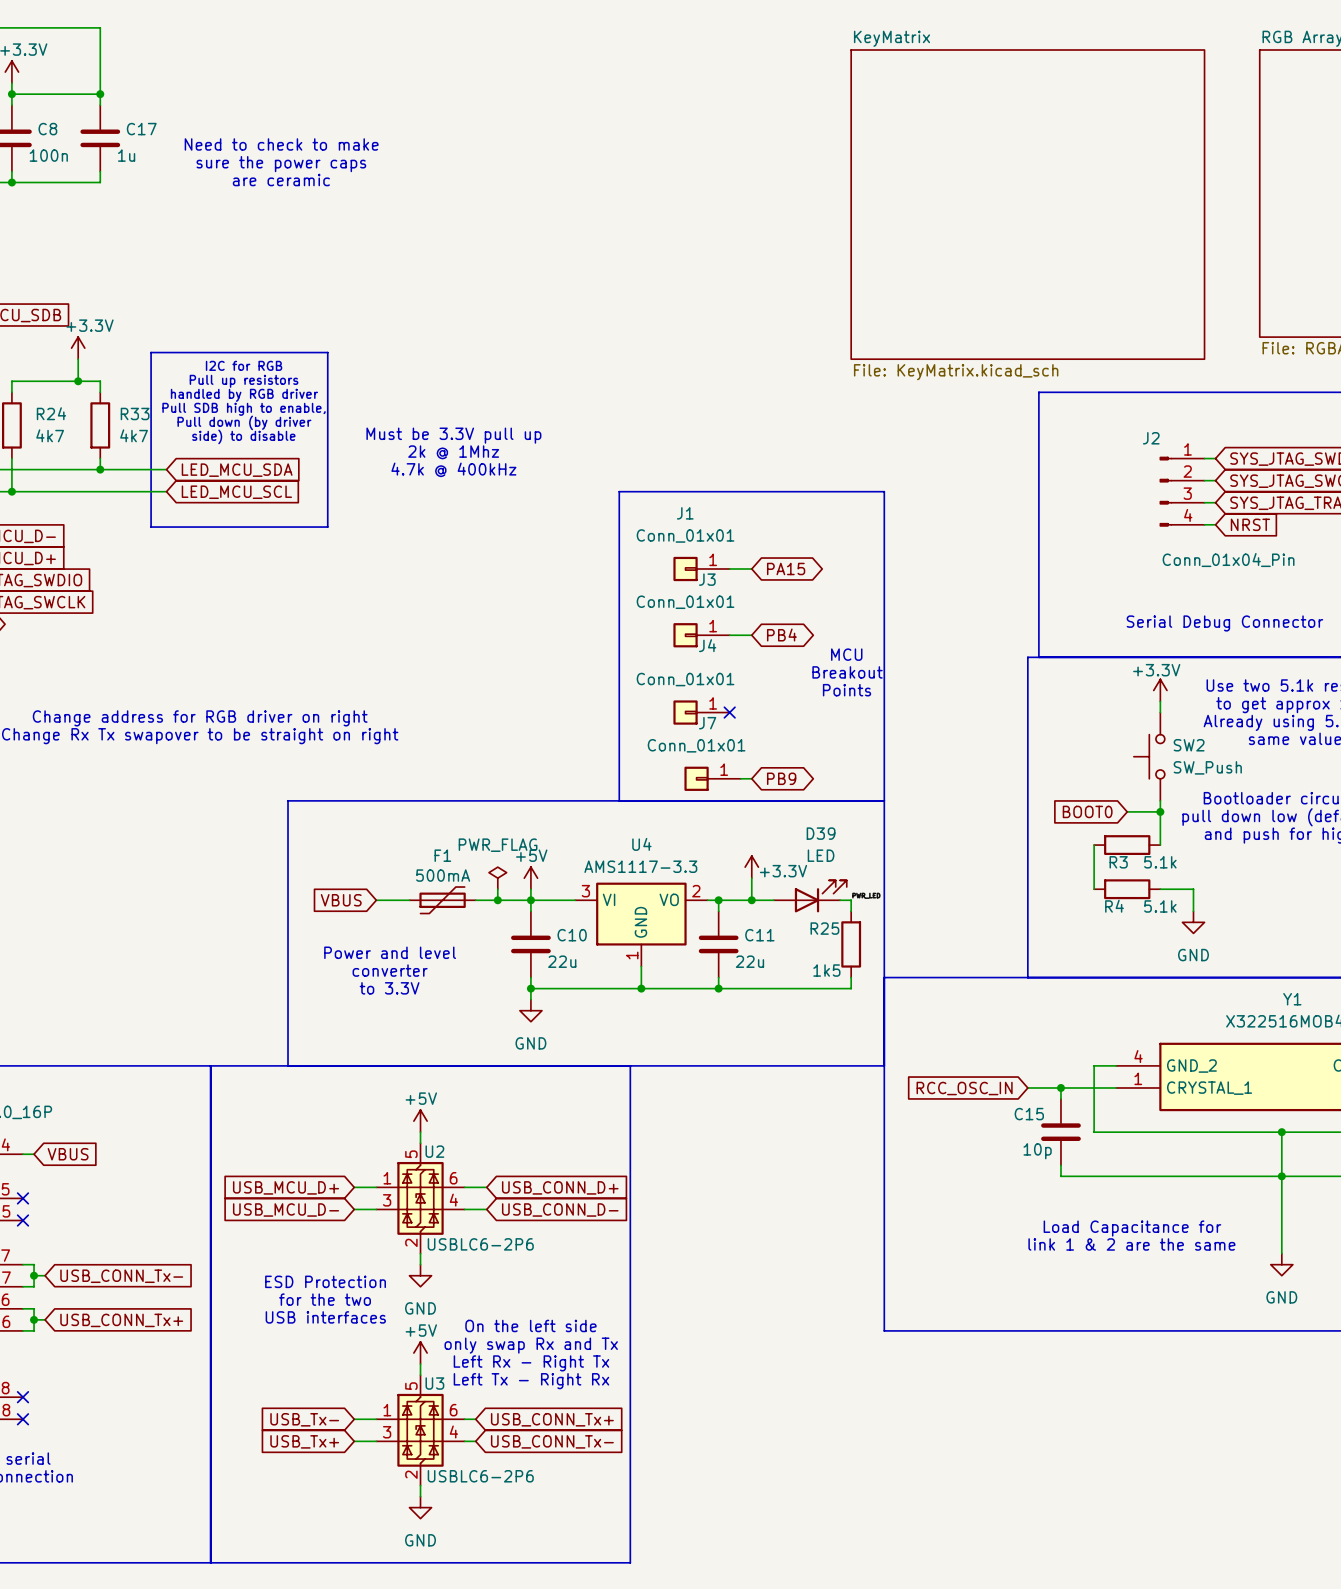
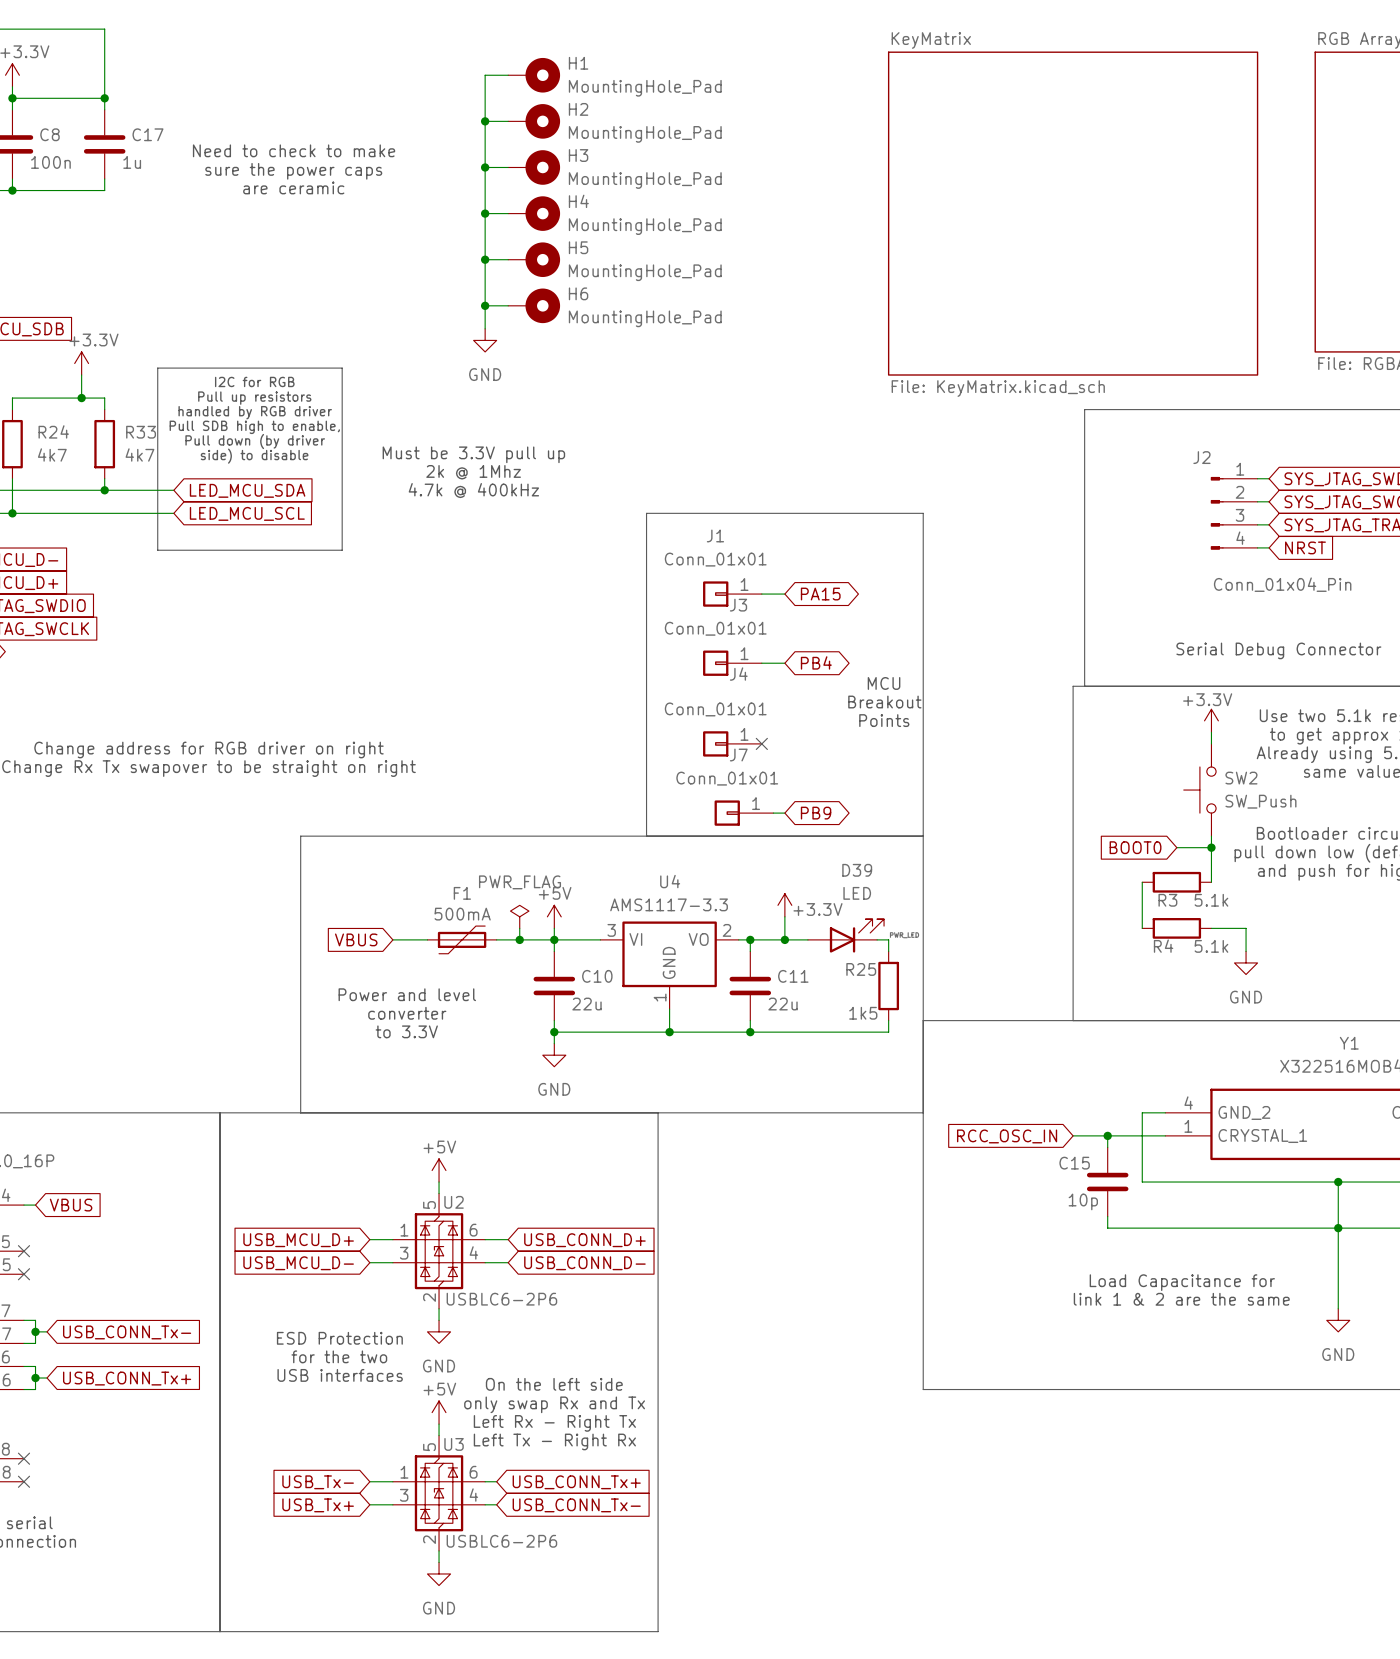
wire: none -> (508, 75) (485, 75) (485, 328)
H1: none -> MountingHole_Pad (534, 75)
wire: none -> (485, 121) (508, 121)
junction: none -> (485, 121)
H2: none -> MountingHole_Pad (534, 121)
wire: none -> (485, 167) (508, 167)
junction: none -> (485, 167)
H3: none -> MountingHole_Pad (534, 167)
wire: none -> (485, 213) (508, 213)
junction: none -> (485, 213)
H4: none -> MountingHole_Pad (534, 213)
wire: none -> (485, 259) (508, 259)
junction: none -> (485, 259)
H5: none -> MountingHole_Pad (534, 259)
wire: none -> (485, 305) (508, 305)
junction: none -> (485, 305)
H6: none -> MountingHole_Pad (534, 305)
power symbol: none -> GND (485, 340)

